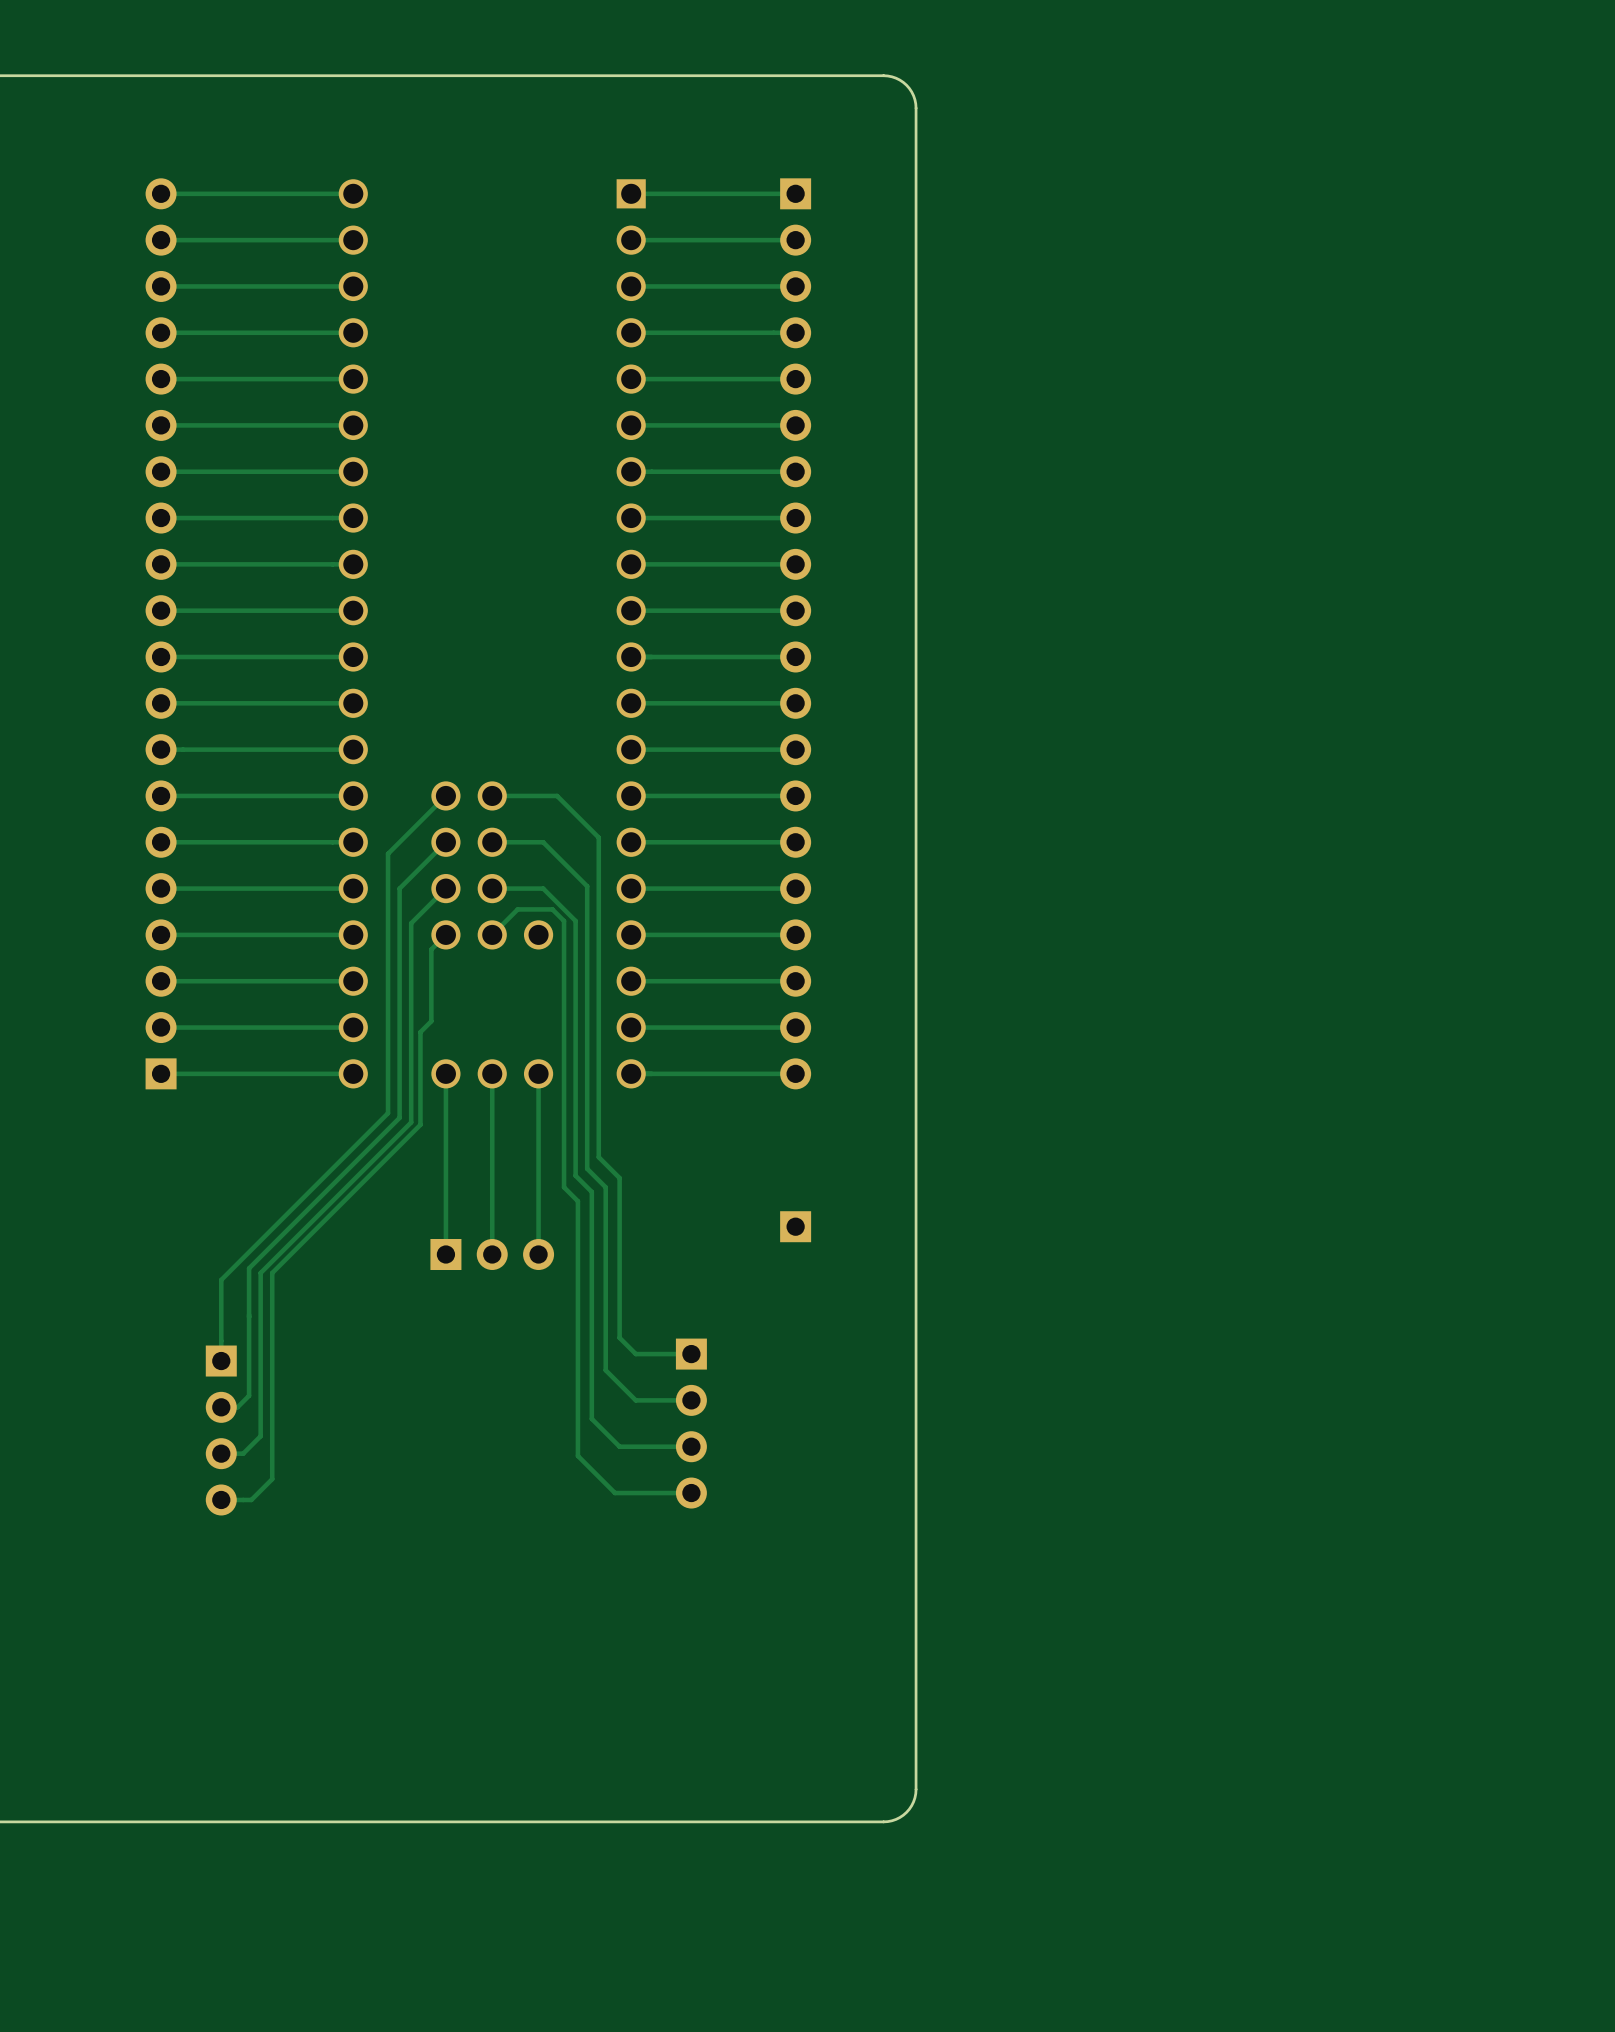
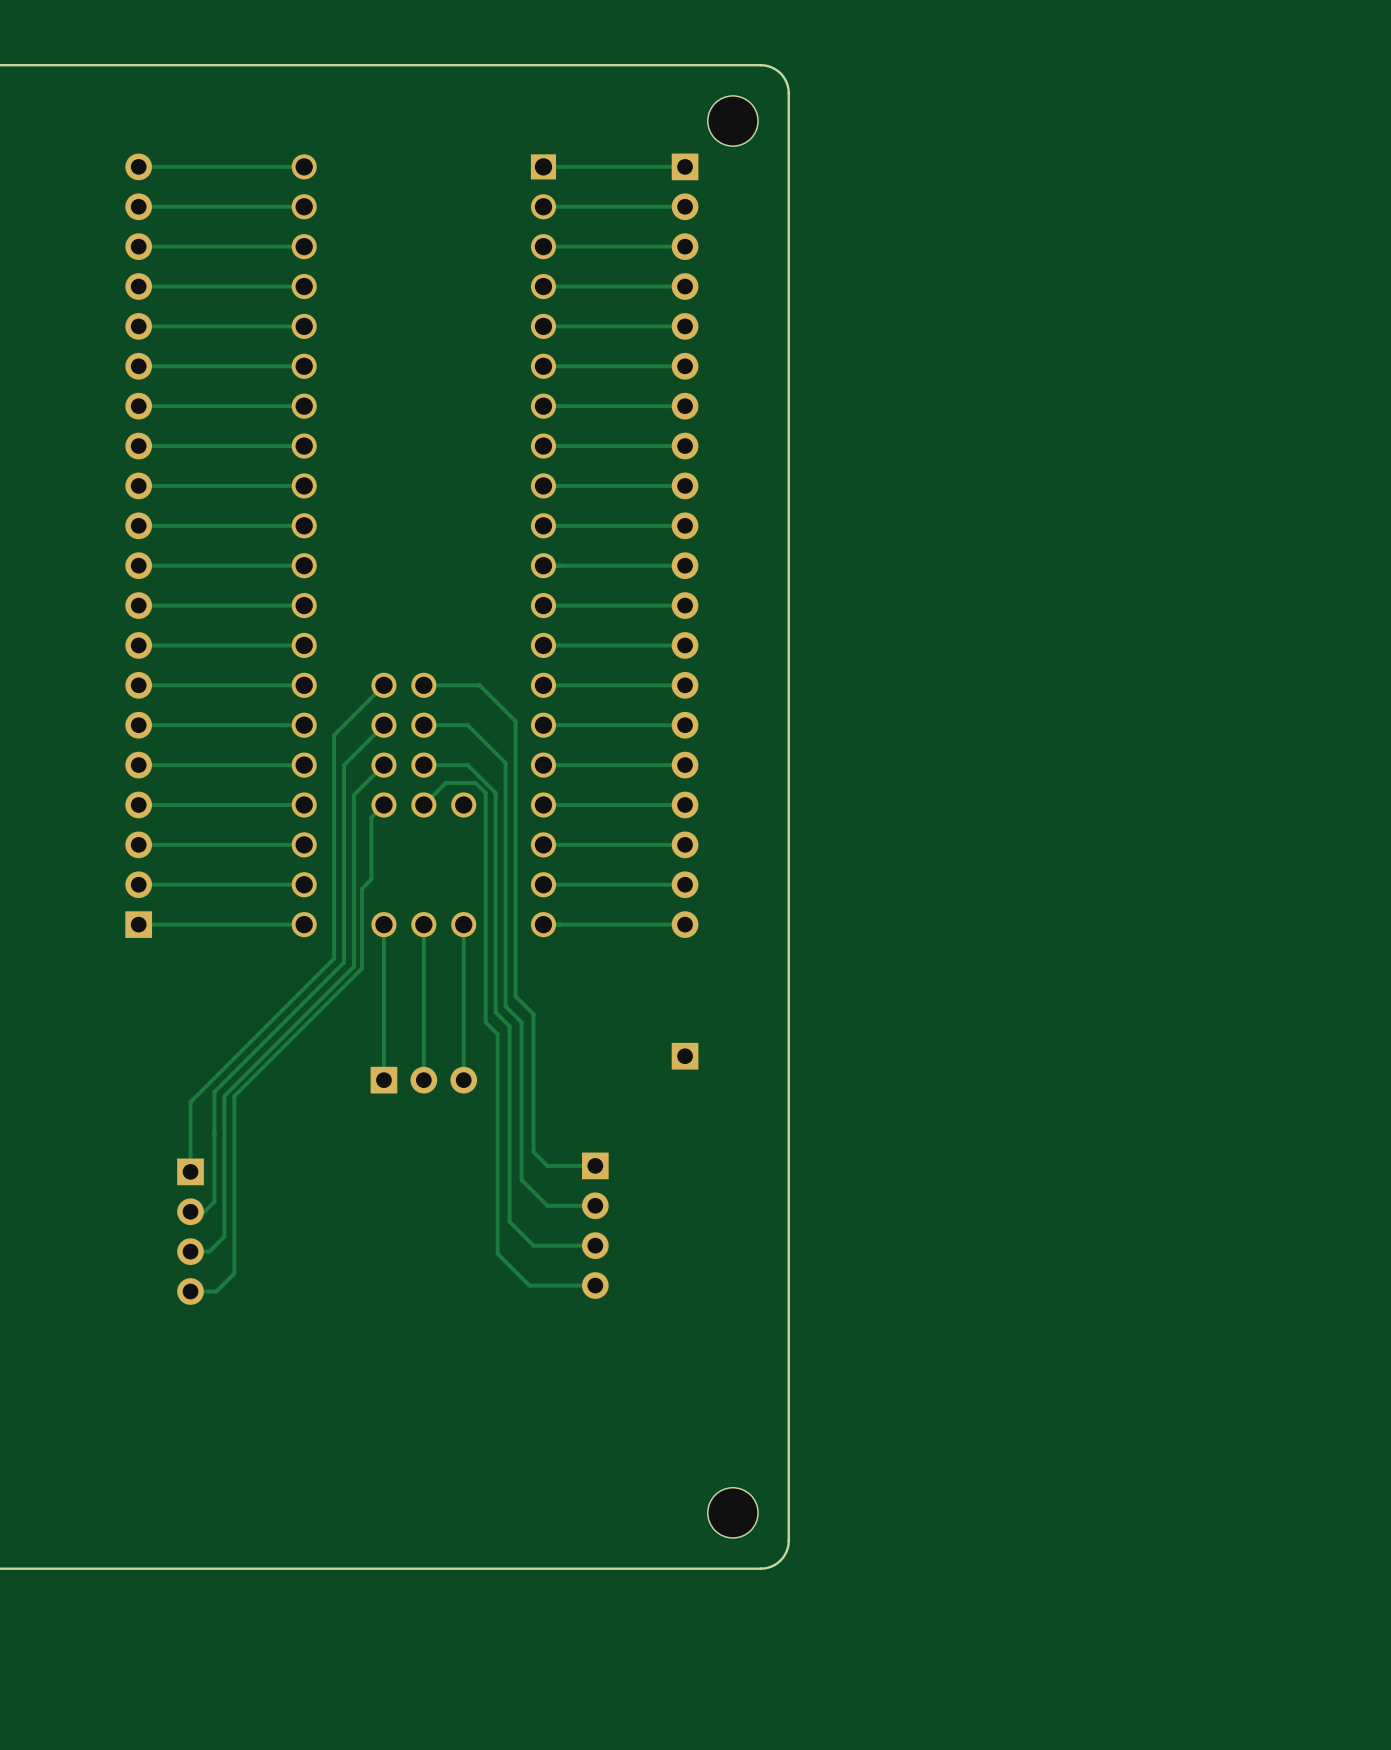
part: none -> (732, 121)
part: none -> (732, 1512)

